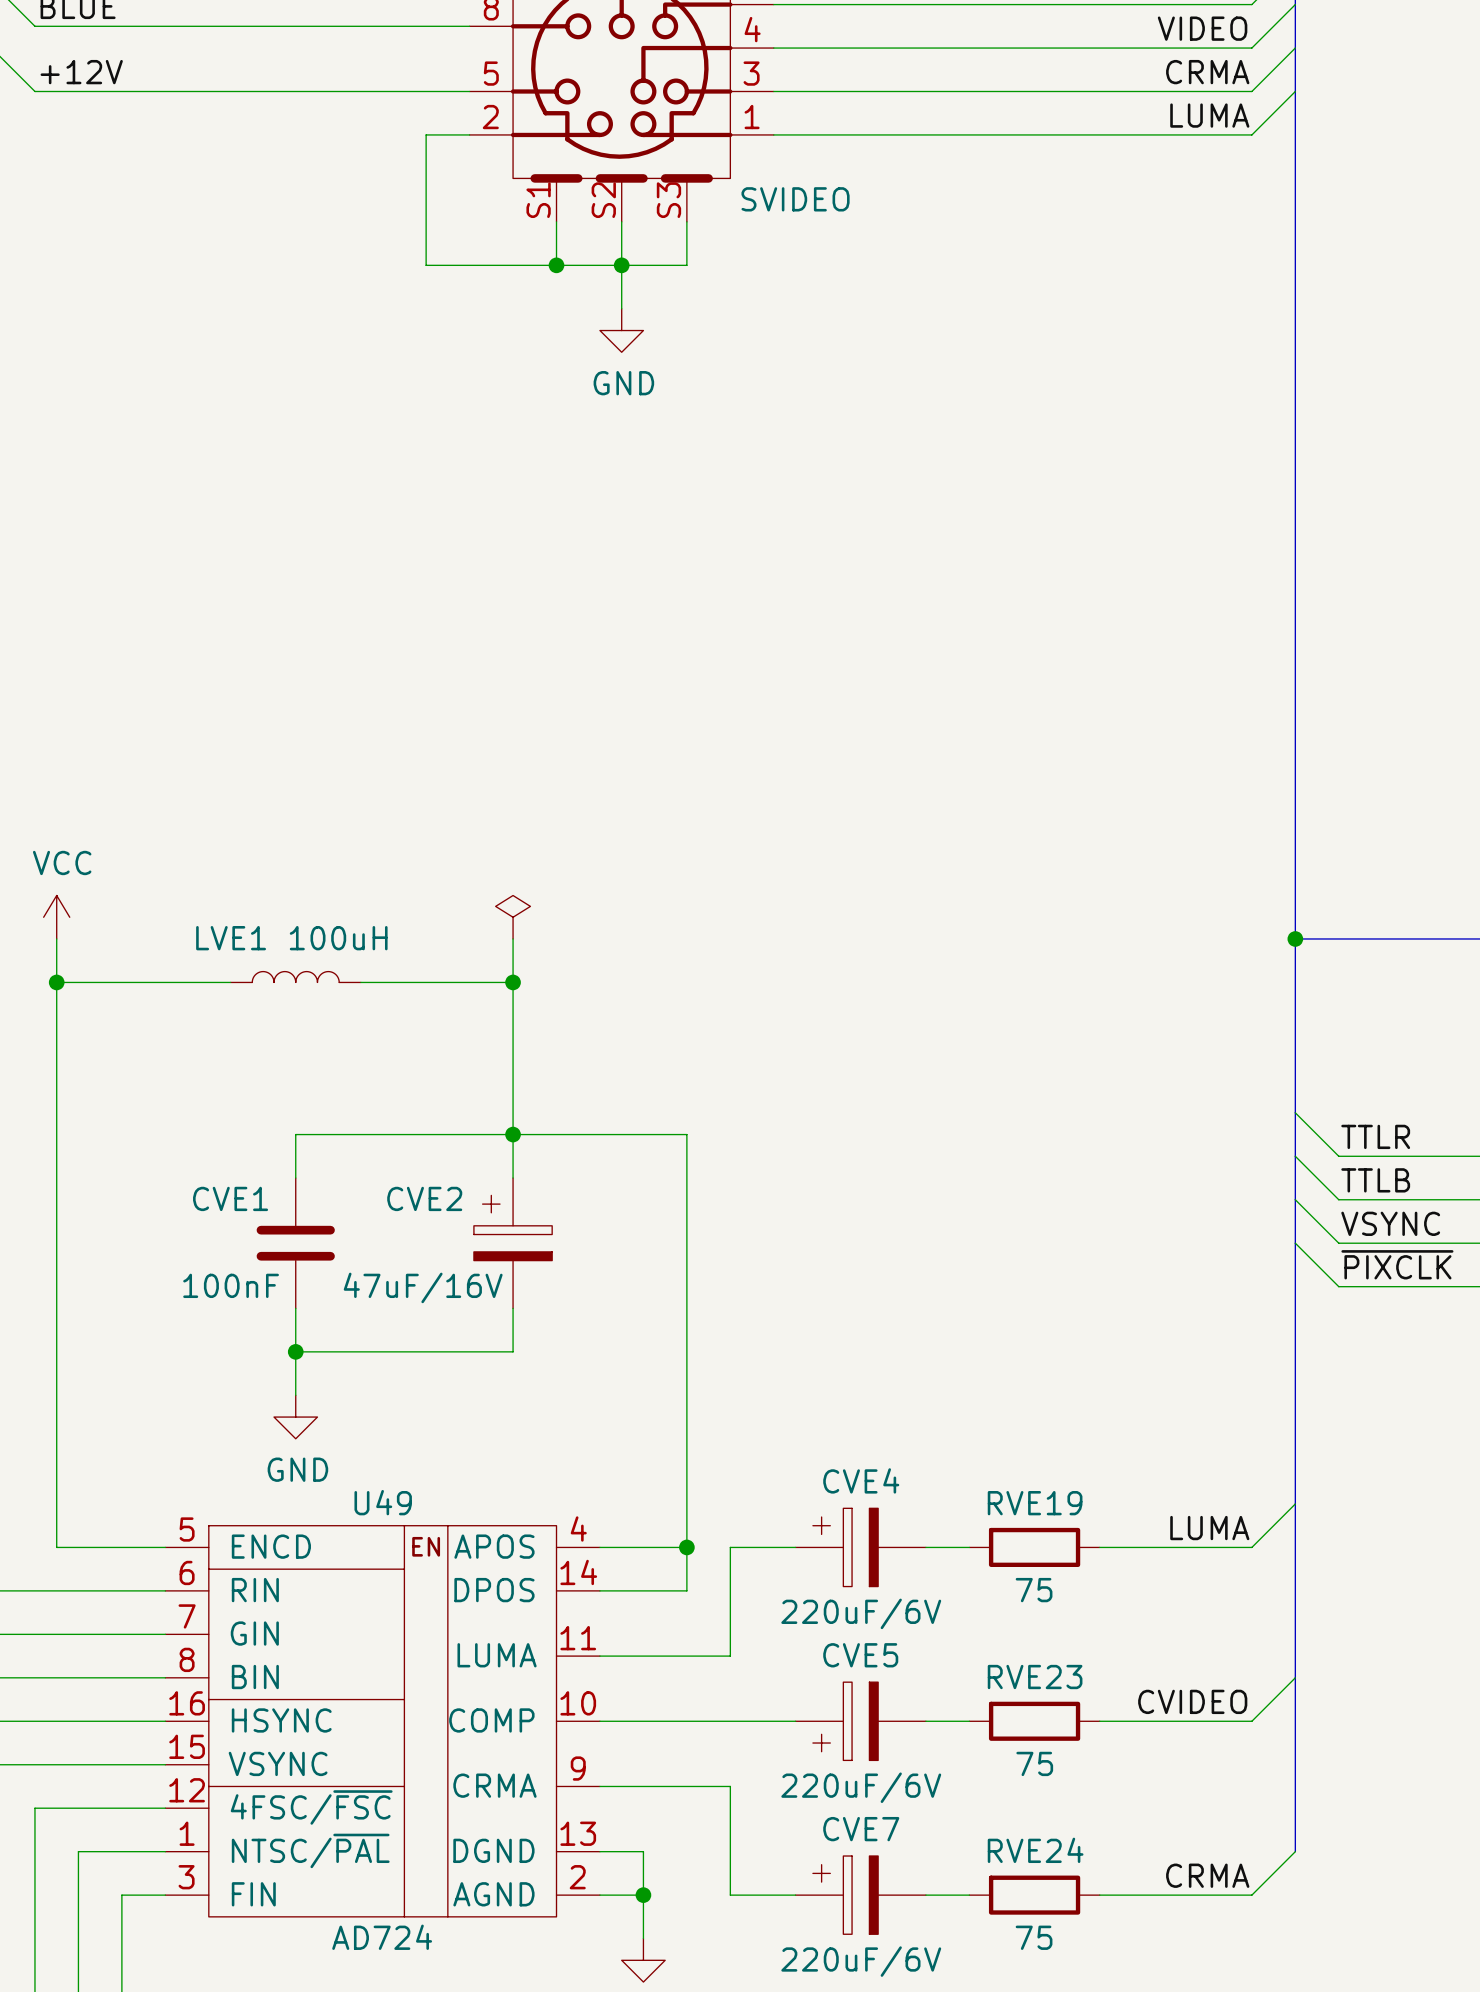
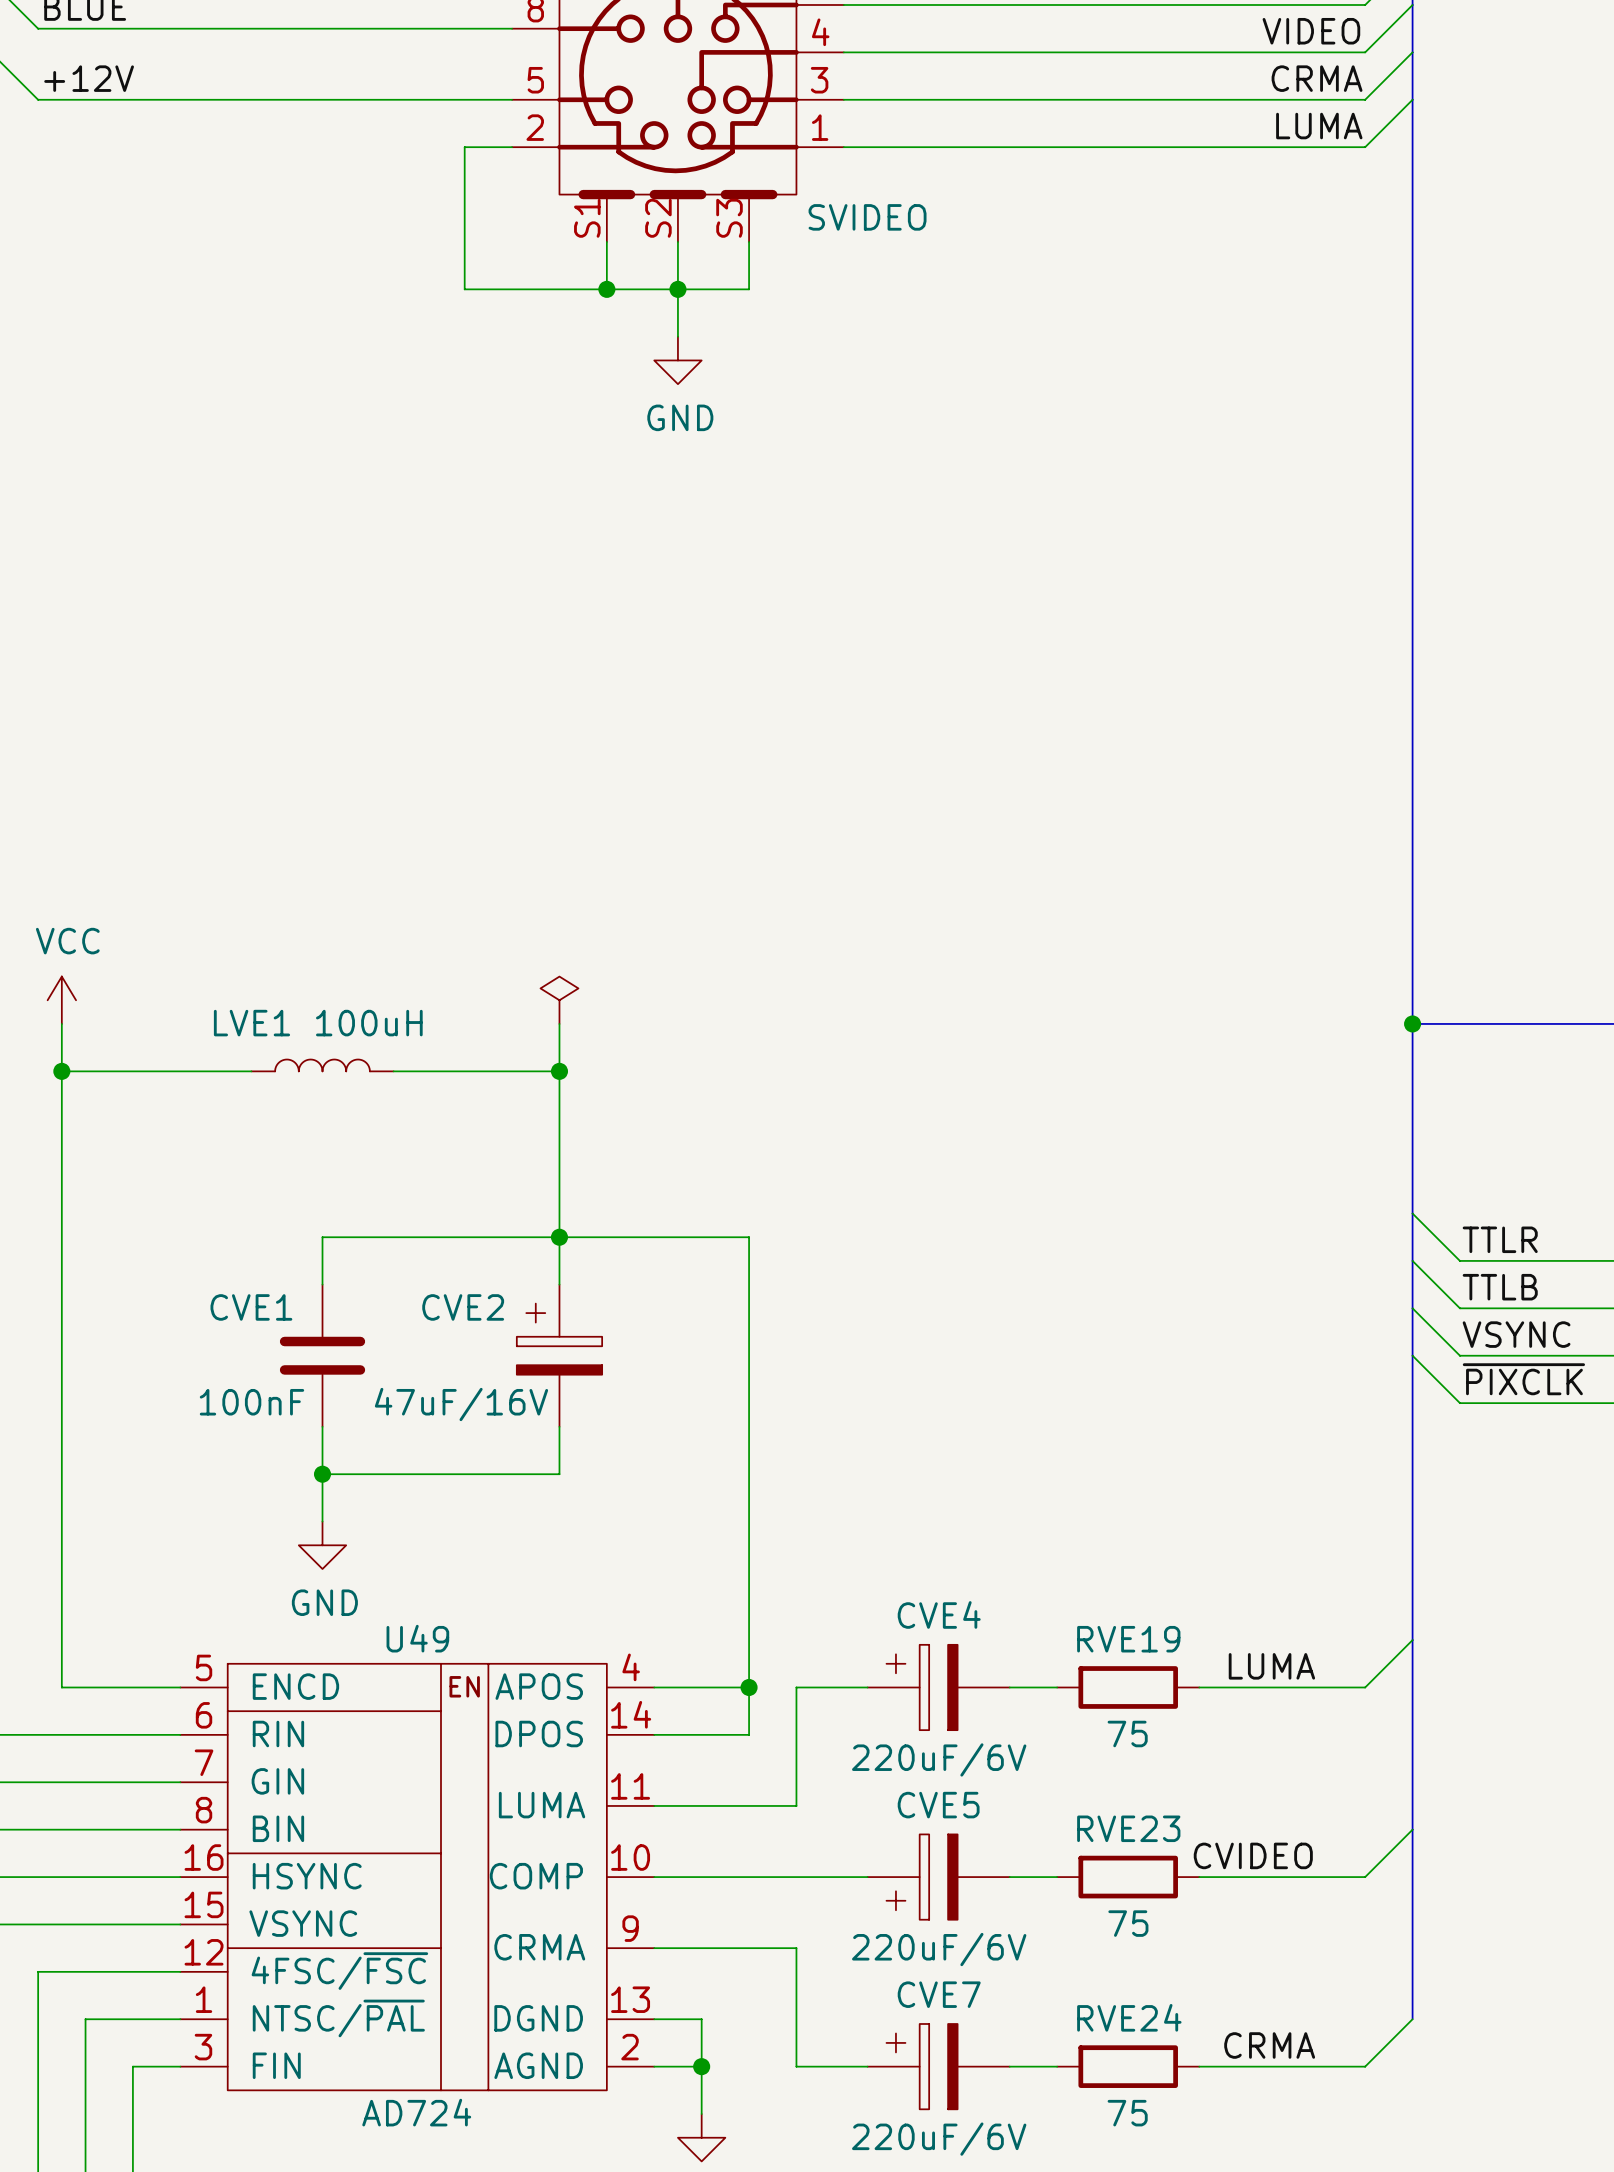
label position: LUMA (1209, 1528) -> LUMA (1271, 1666)
label position: CVIDEO (1192, 1701) -> CVIDEO (1253, 1855)
label position: CRMA (1207, 1875) -> CRMA (1269, 2045)

